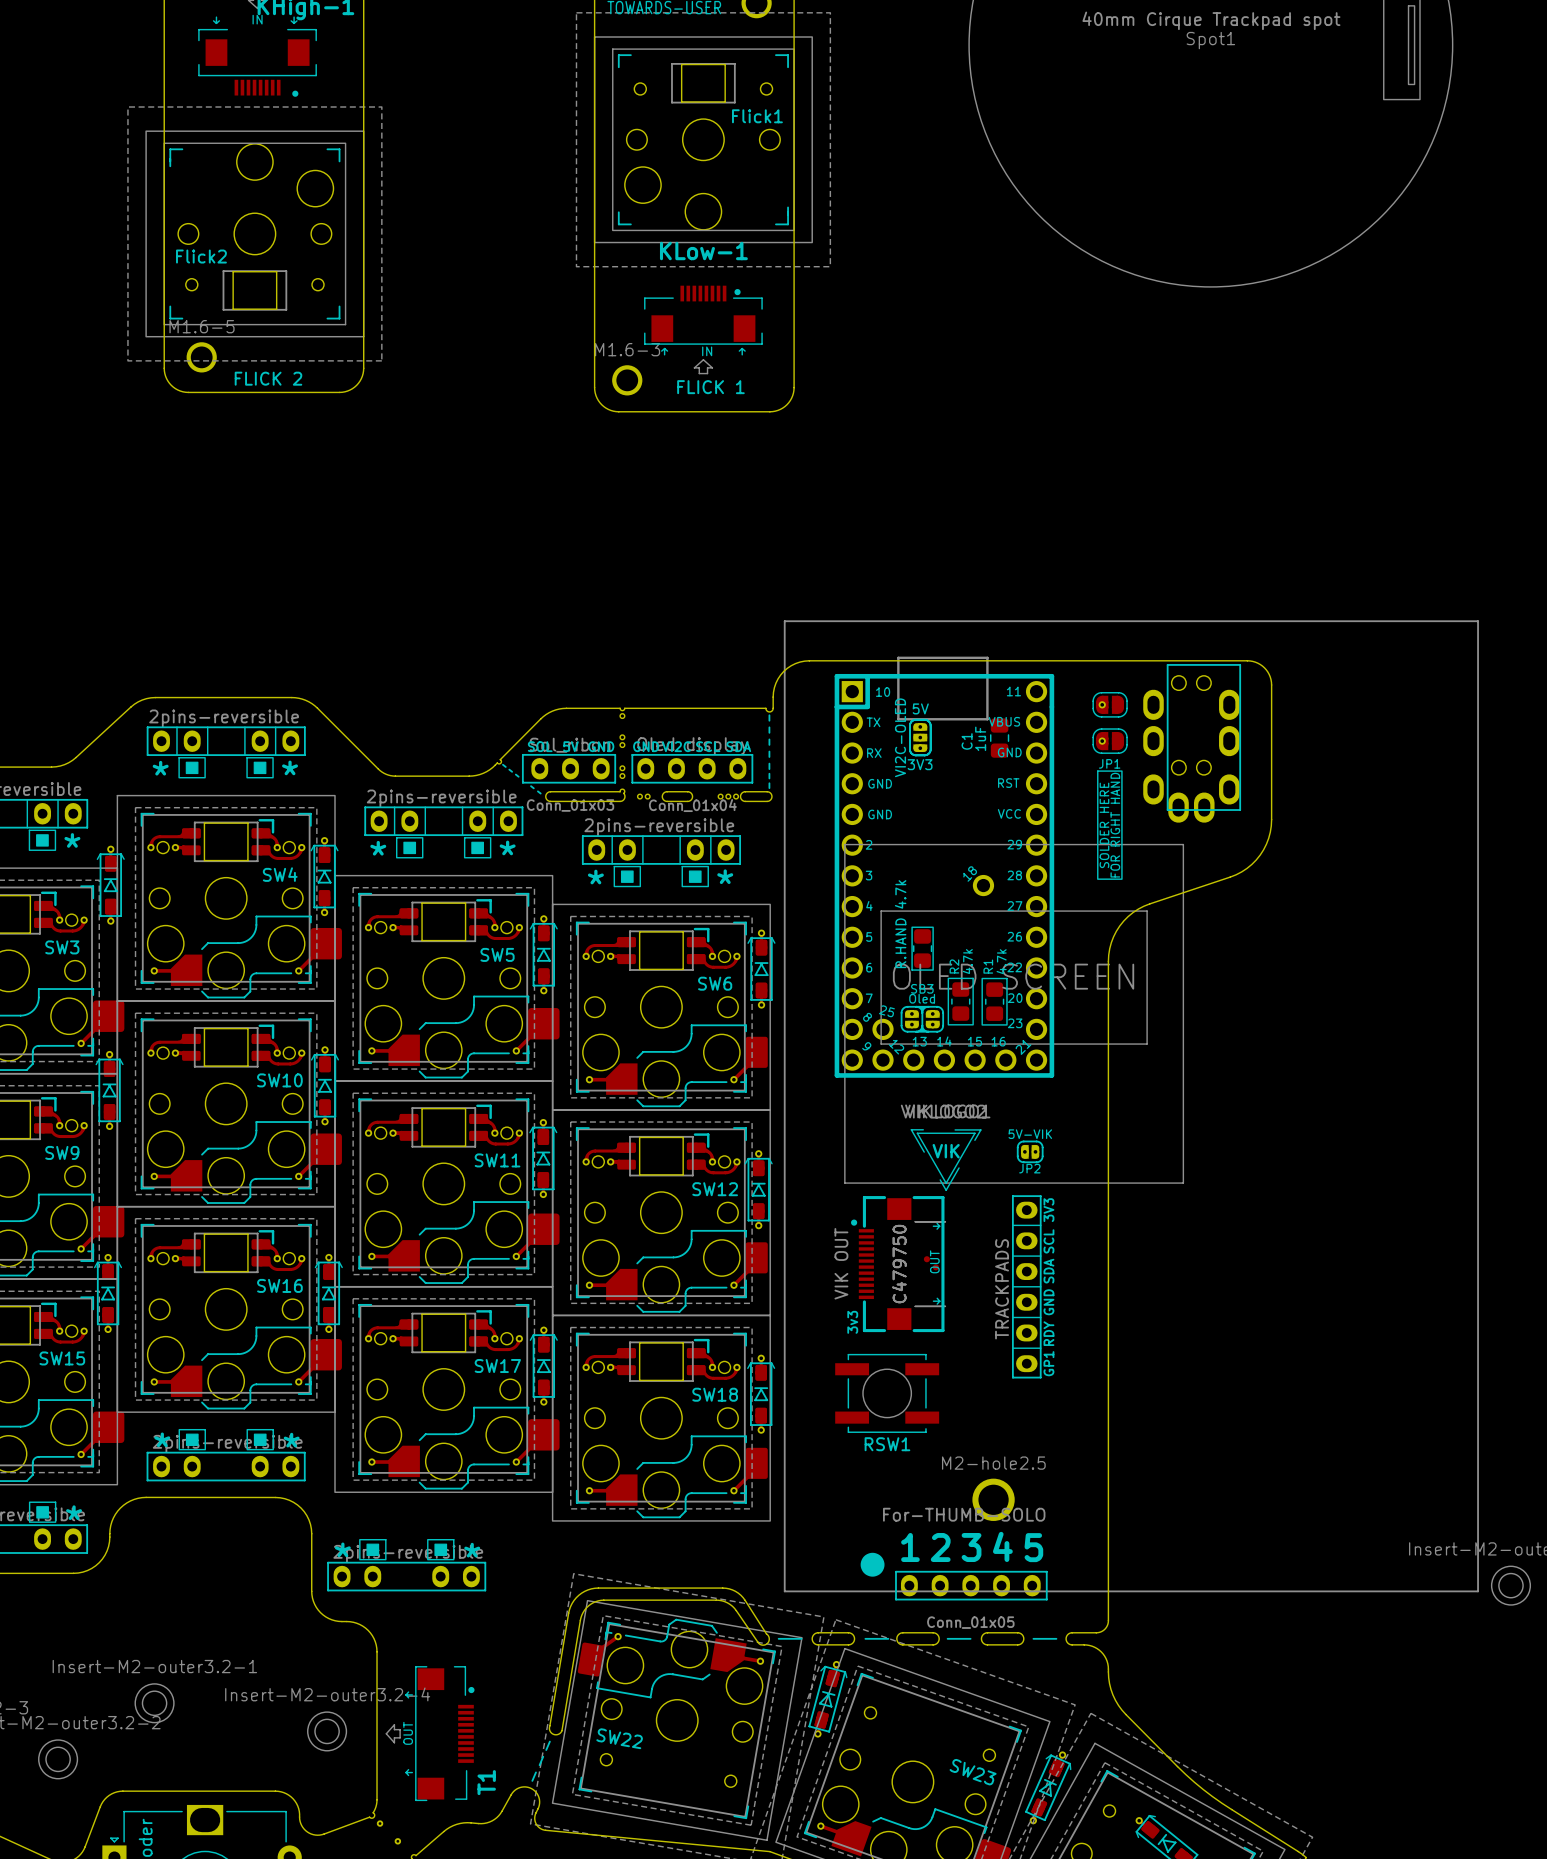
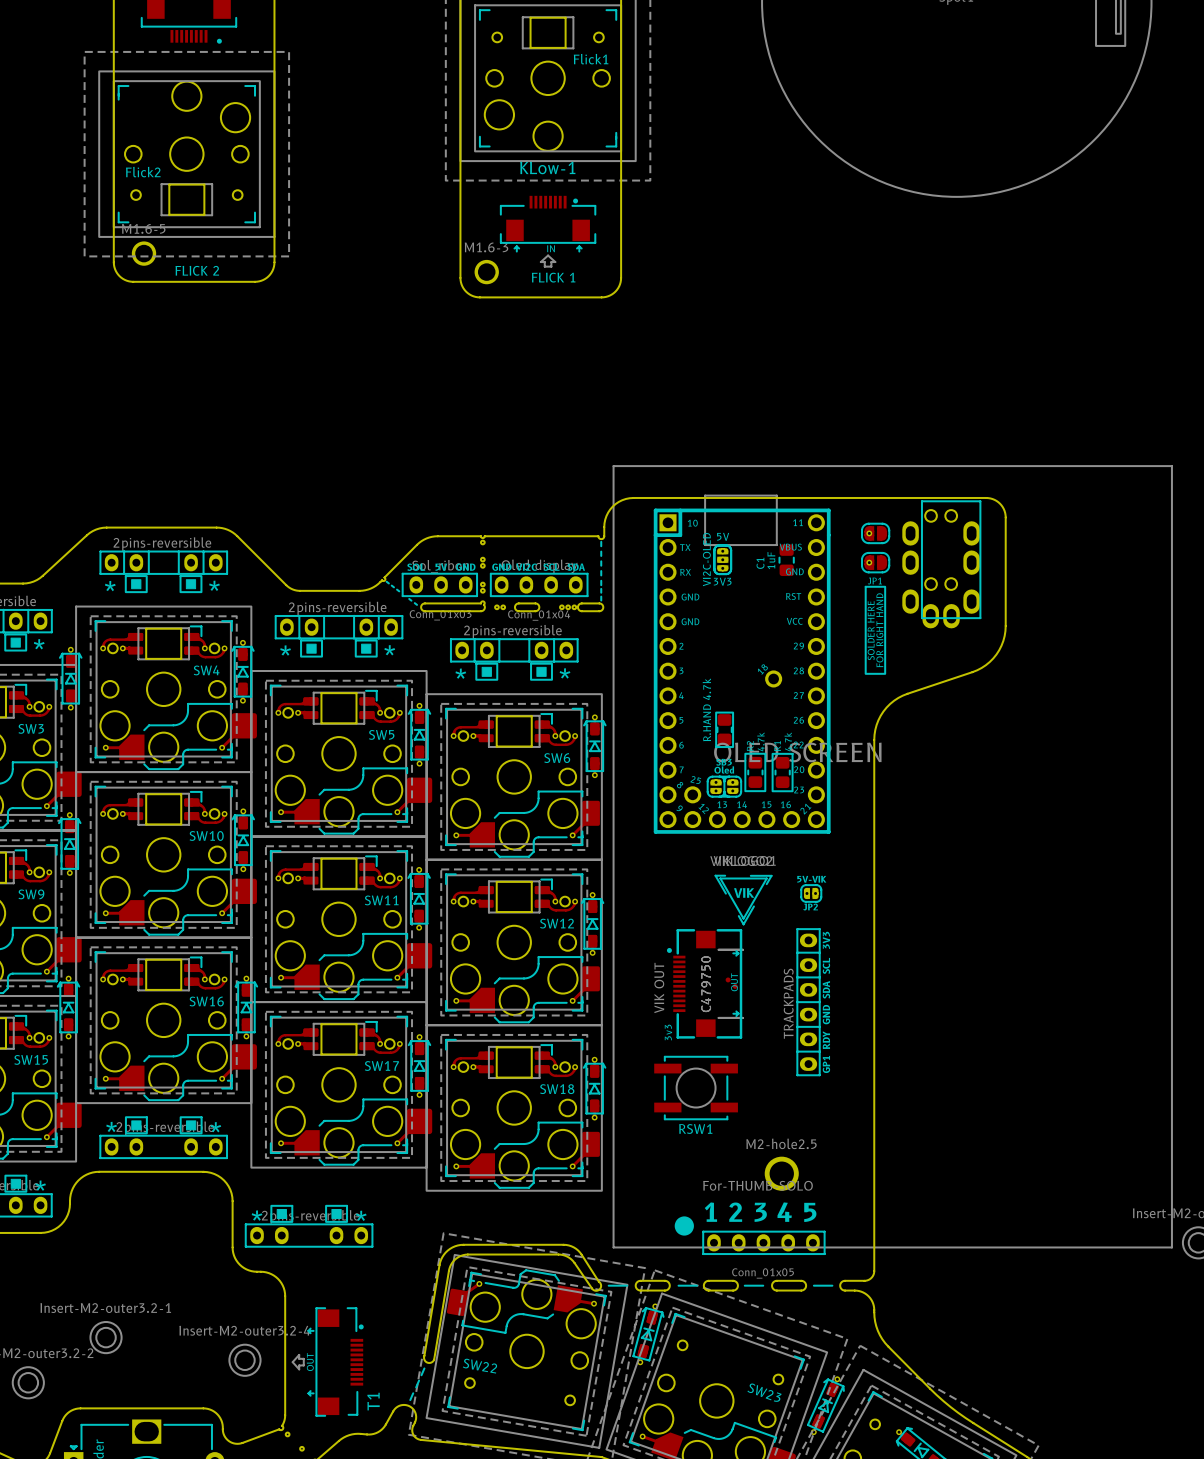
line: (844, 844) (1183, 844) (1183, 1183) (844, 1183) (844, 844) -> none
line: (881, 911) (1147, 911) (1147, 1044) (881, 1044) (881, 911) -> none

